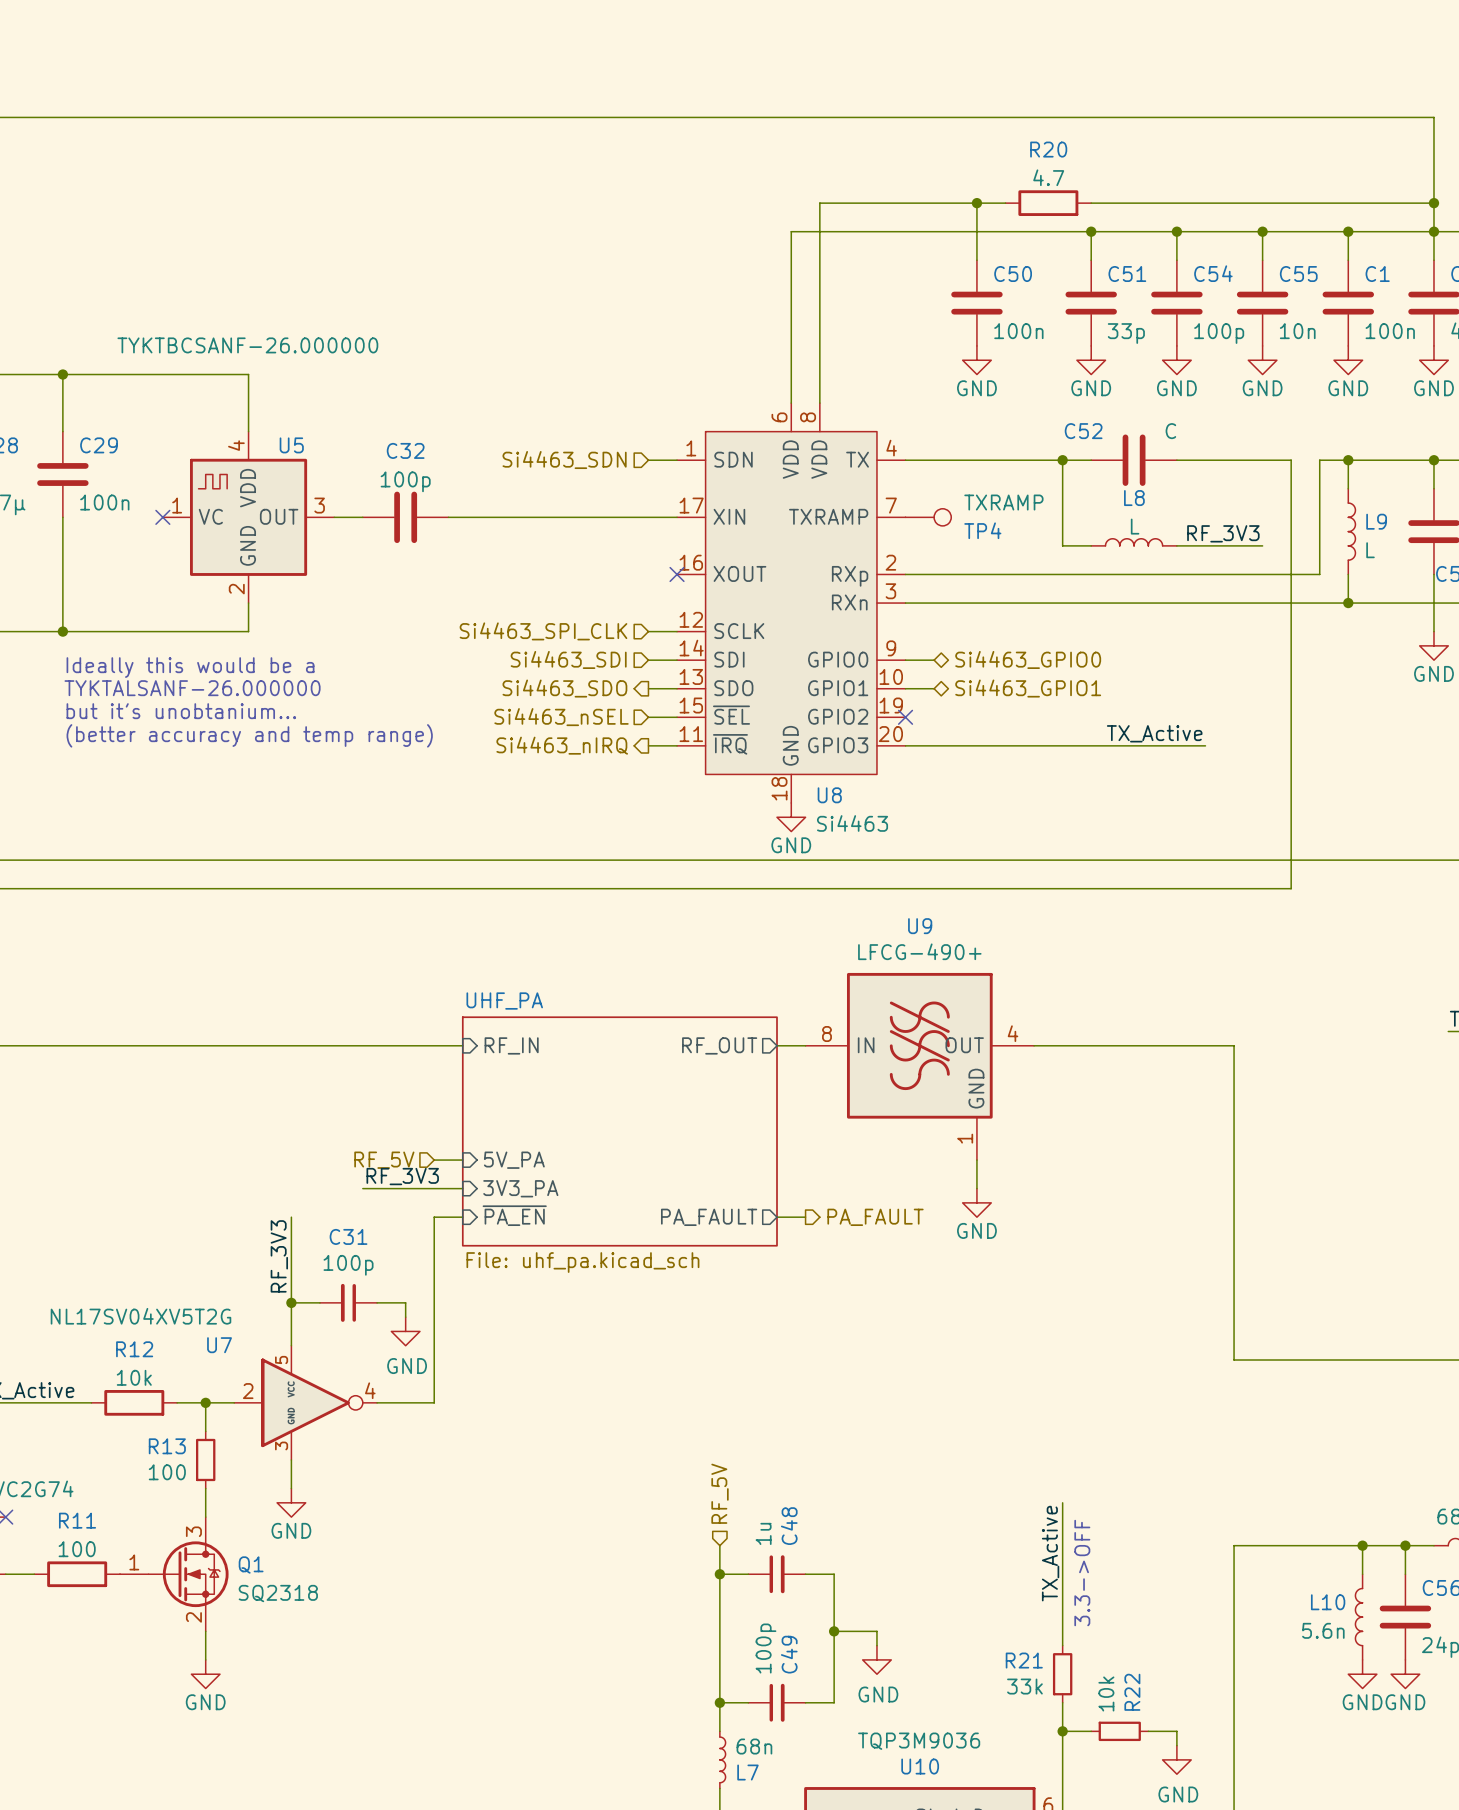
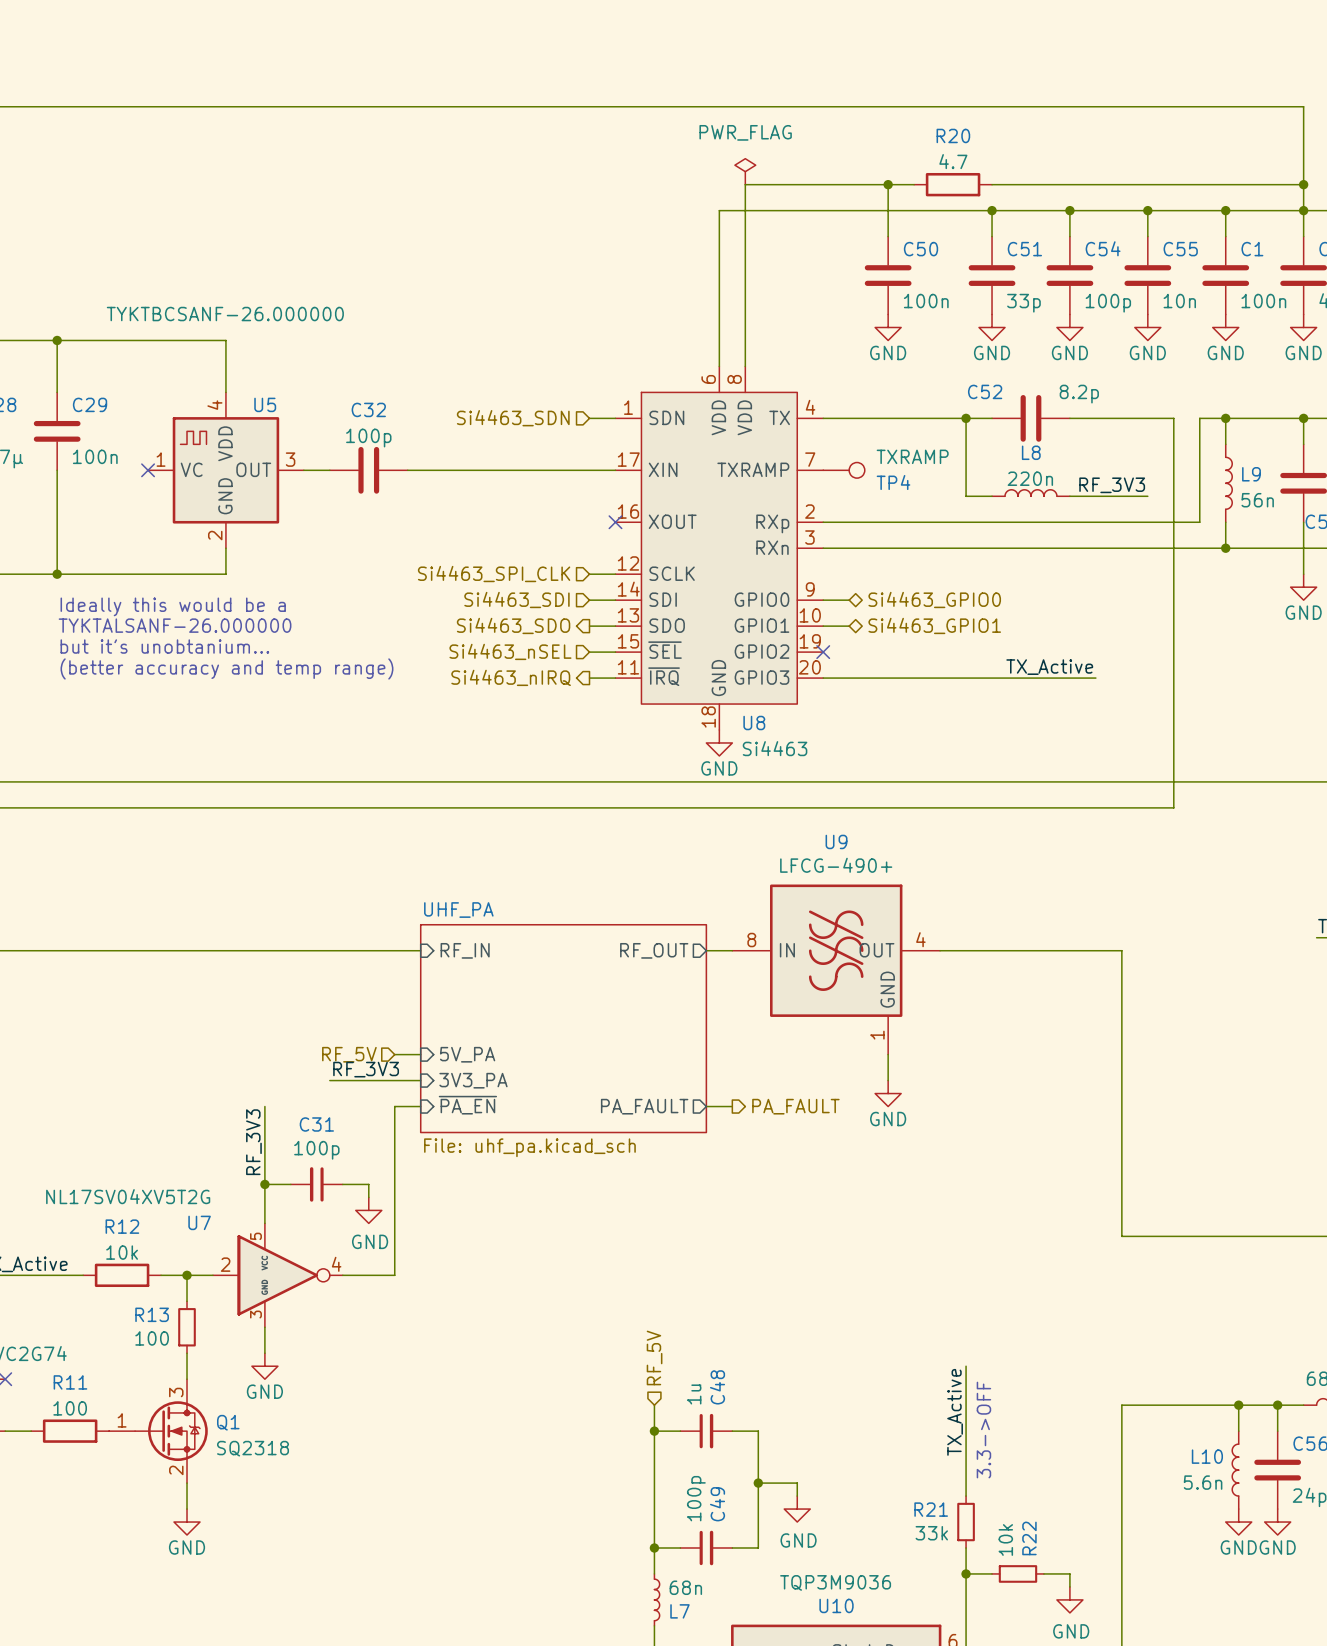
power symbol: none -> PWR_FLAG (745, 171)
C52 value: C (1170, 431) -> 8.2p (1079, 394)
L8 value: L (1135, 526) -> 220n (1030, 478)
L9 value: L (1370, 550) -> 56n (1257, 500)

